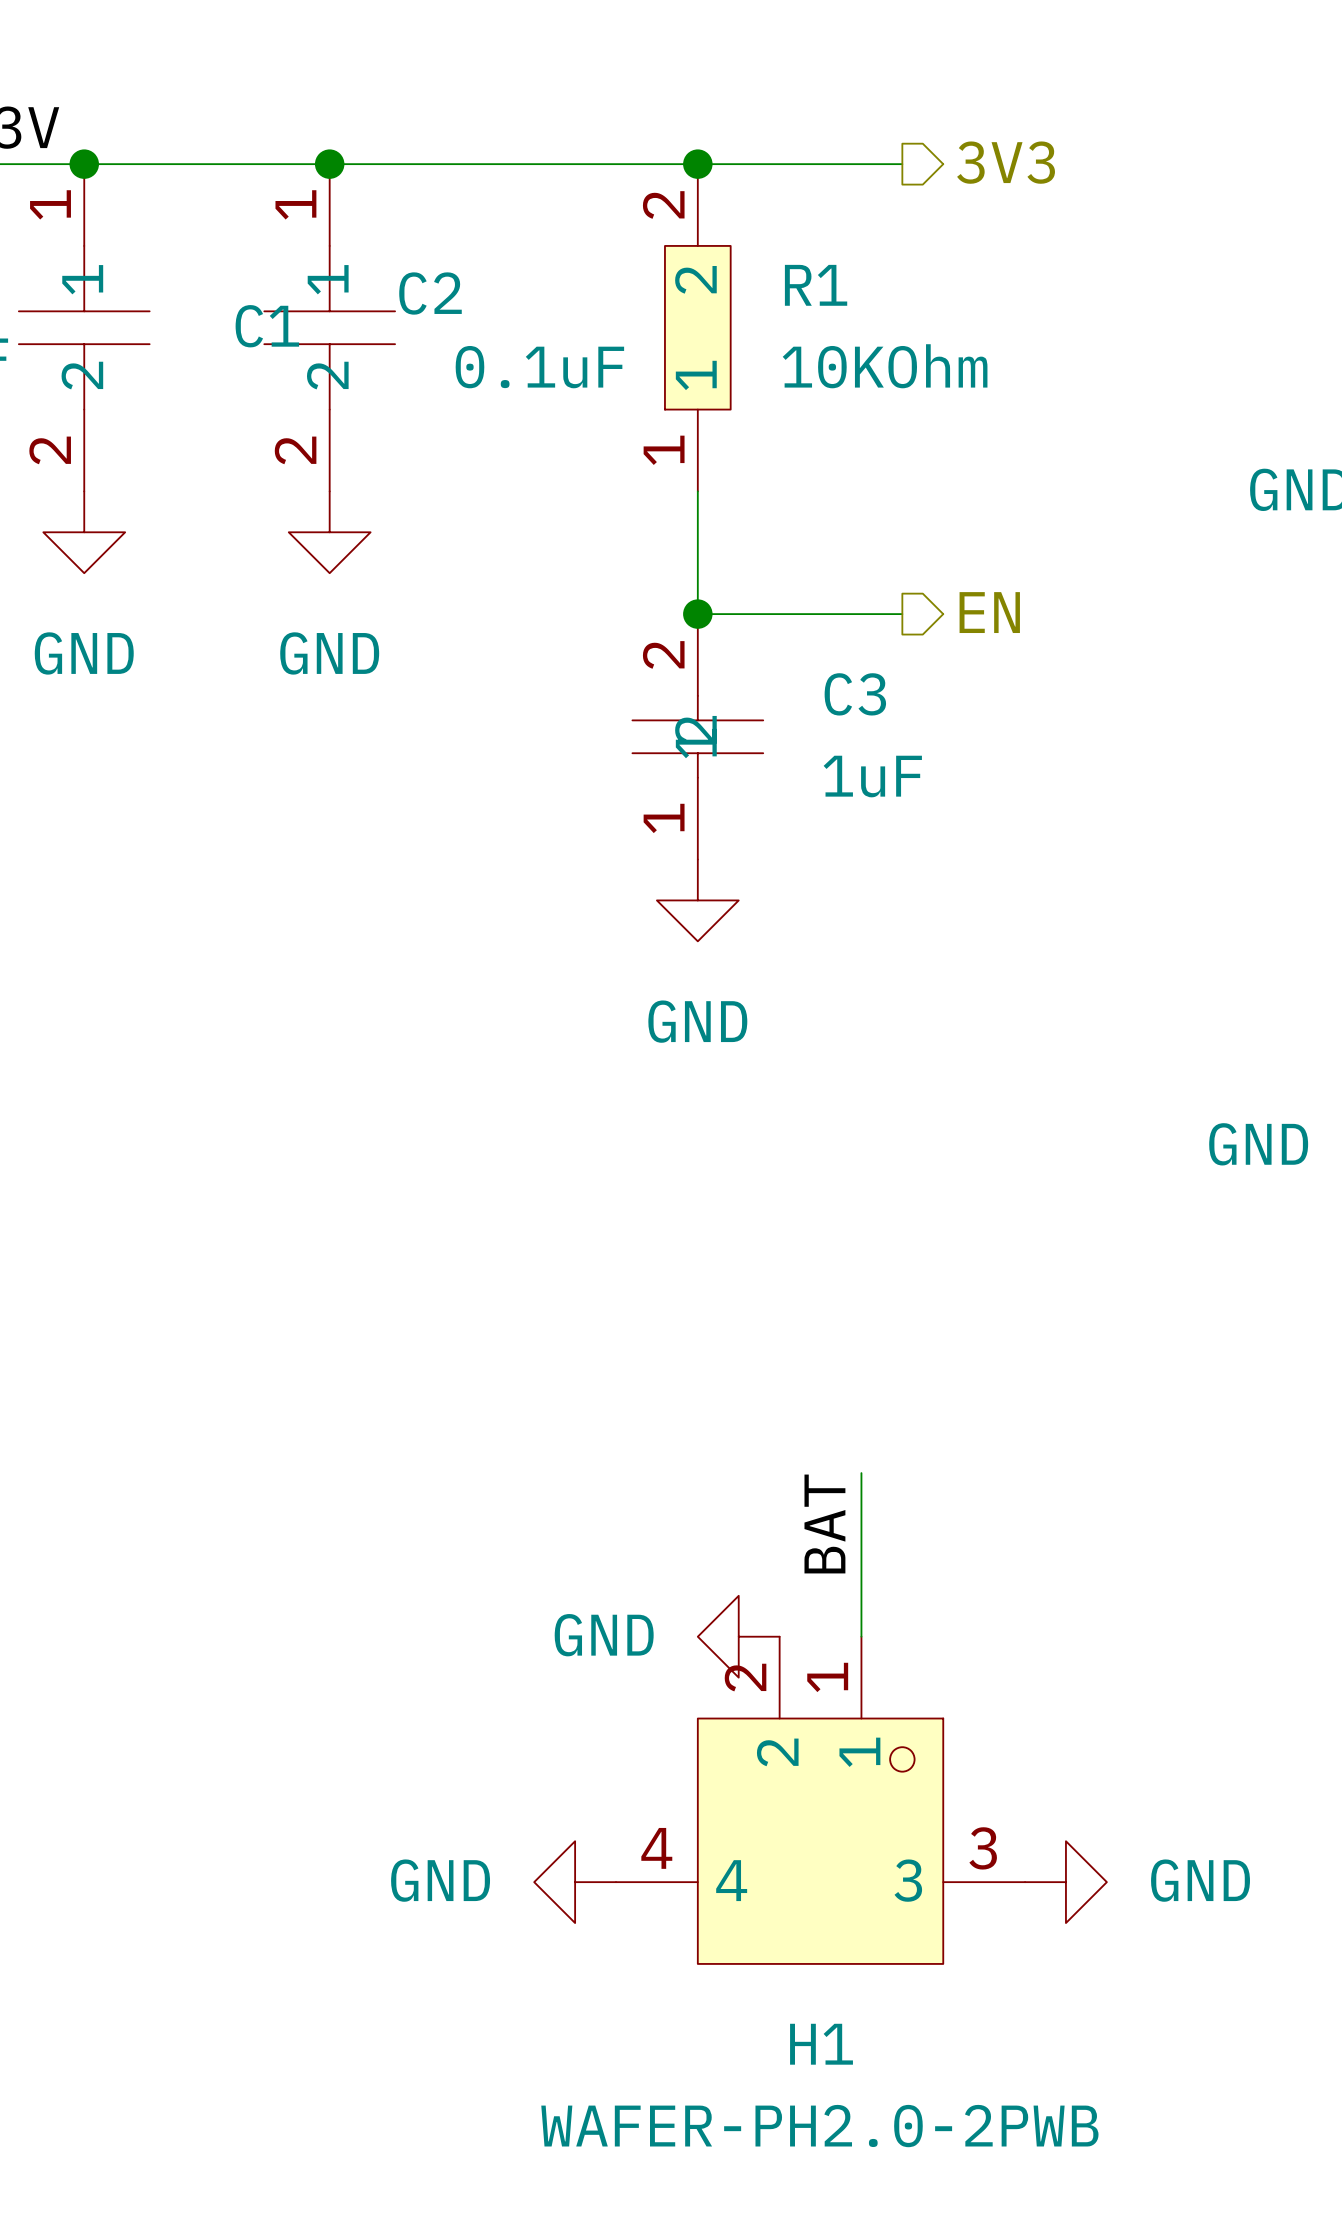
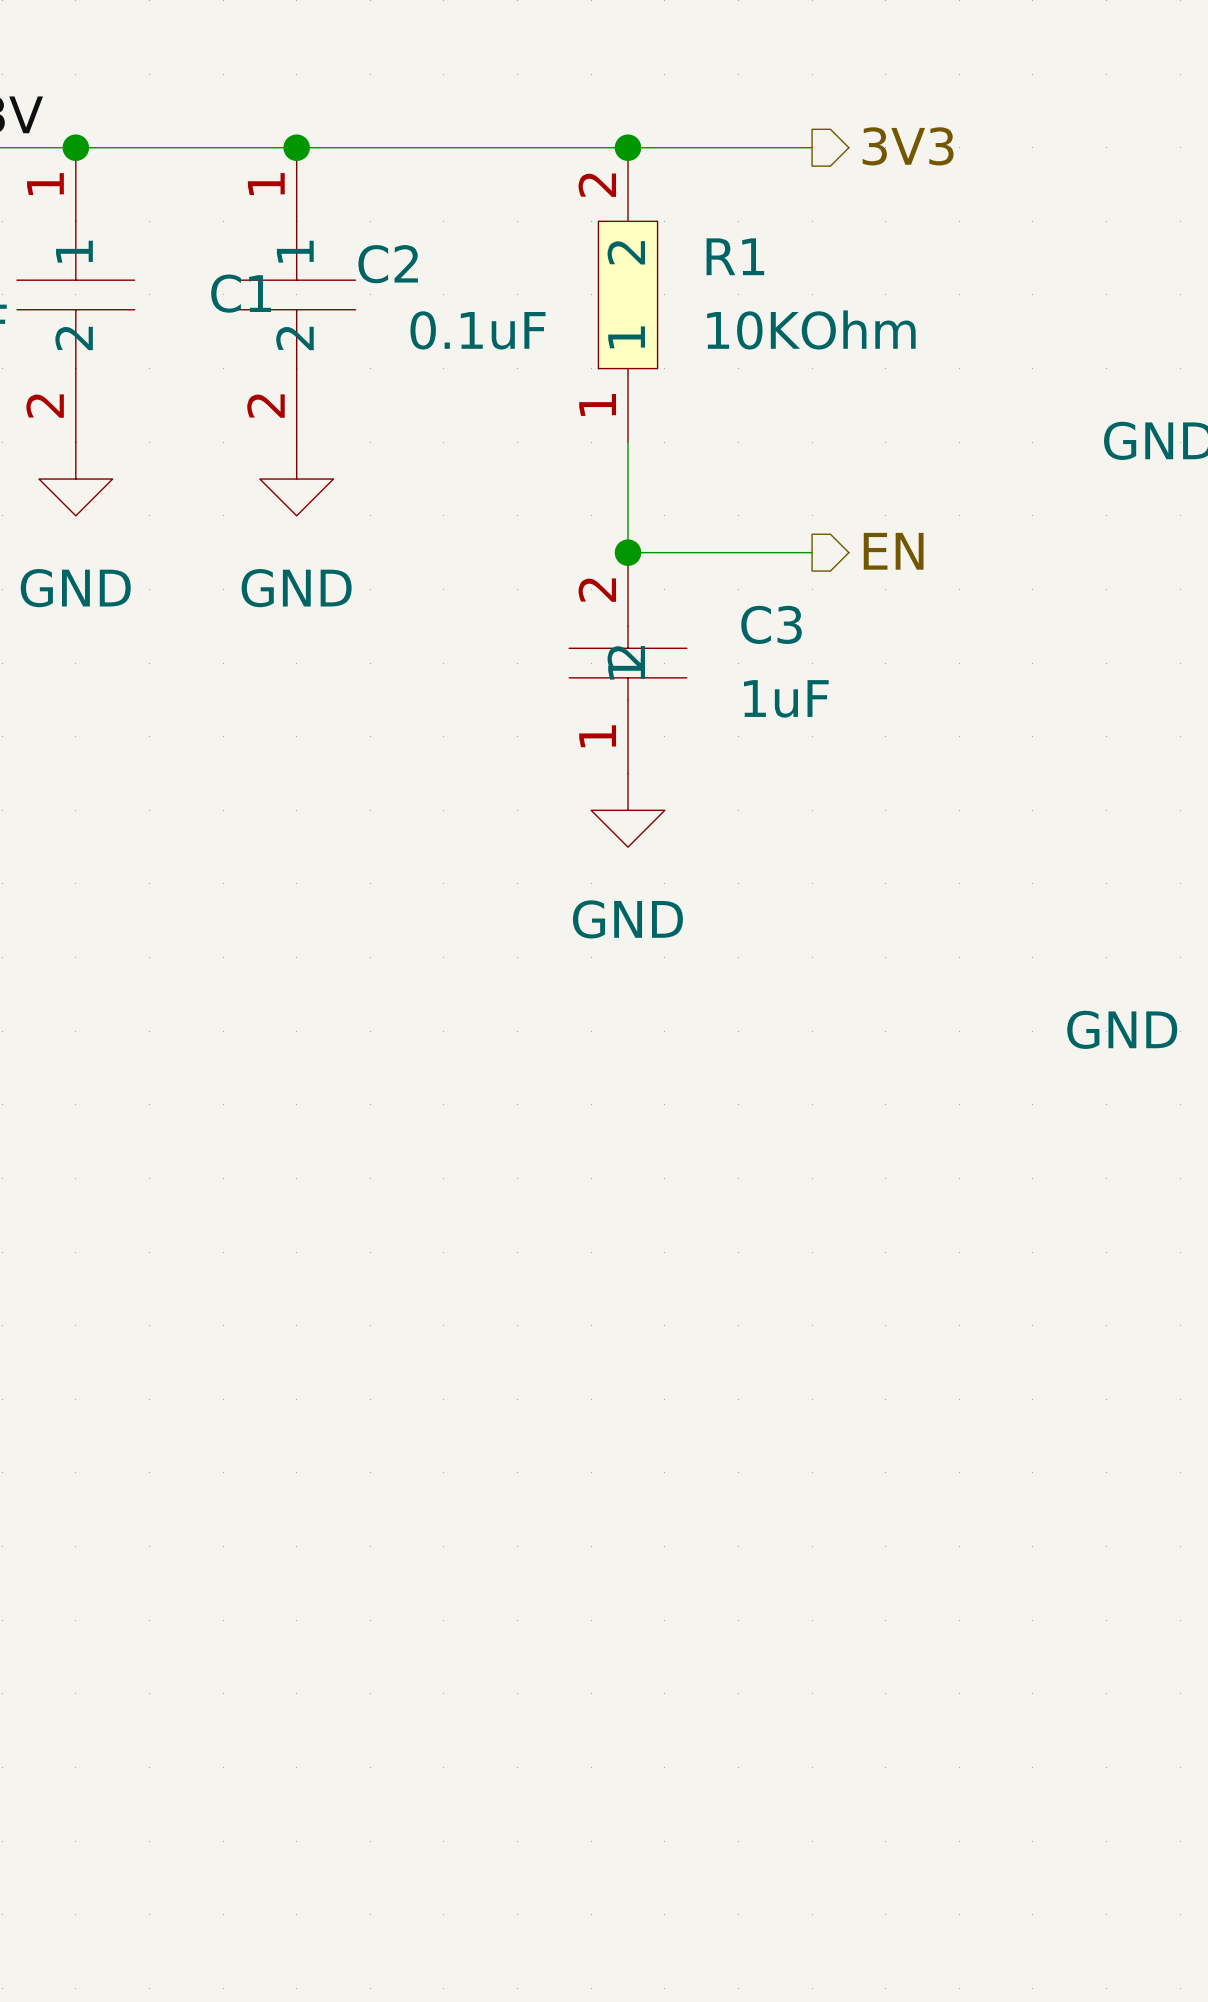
wire: (861, 1473) (861, 1636) -> none
label: BAT (824, 1523) -> none
power symbol: GND (738, 1636) -> none
H1: WAFER-PH2.0-2PWB (820, 1800) -> none
power symbol: GND (575, 1882) -> none
power symbol: GND (1065, 1882) -> none

